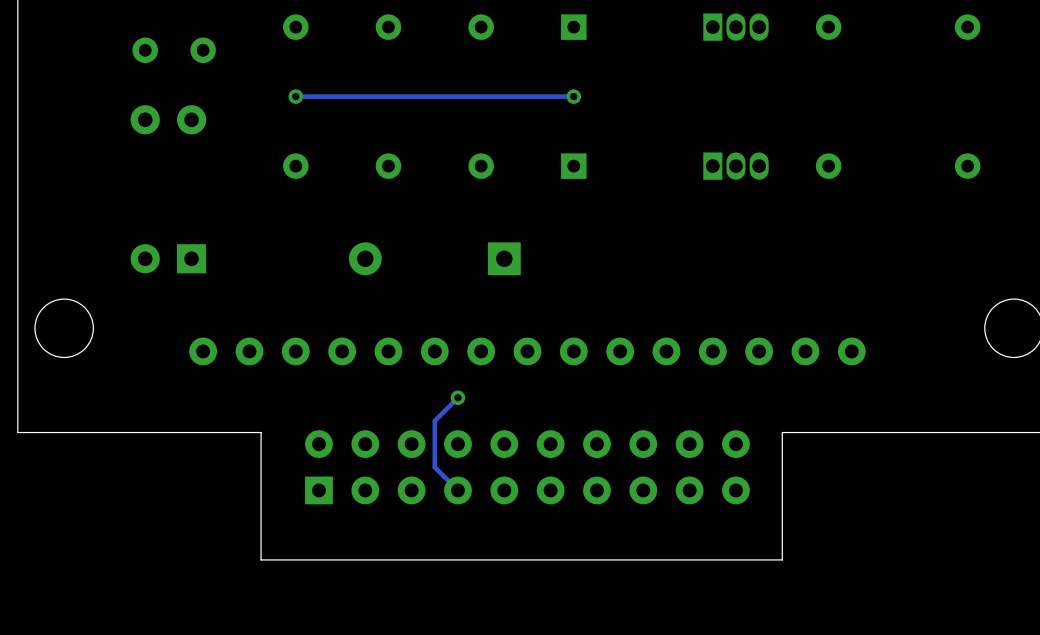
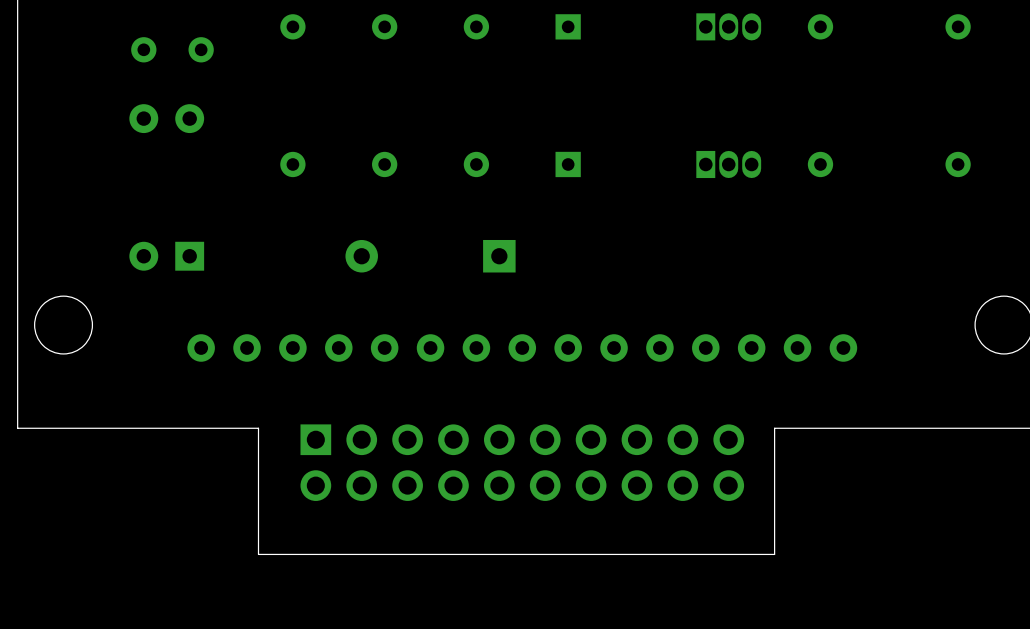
via: (295, 96) -> none
track: (573, 96) (295, 96) -> none
via: (573, 96) -> none
track: (457, 397) (434, 420) (434, 467) (457, 490) -> none
via: (457, 397) -> none
part footprint: [305, 430, 750, 505] -> [300, 424, 745, 501]

